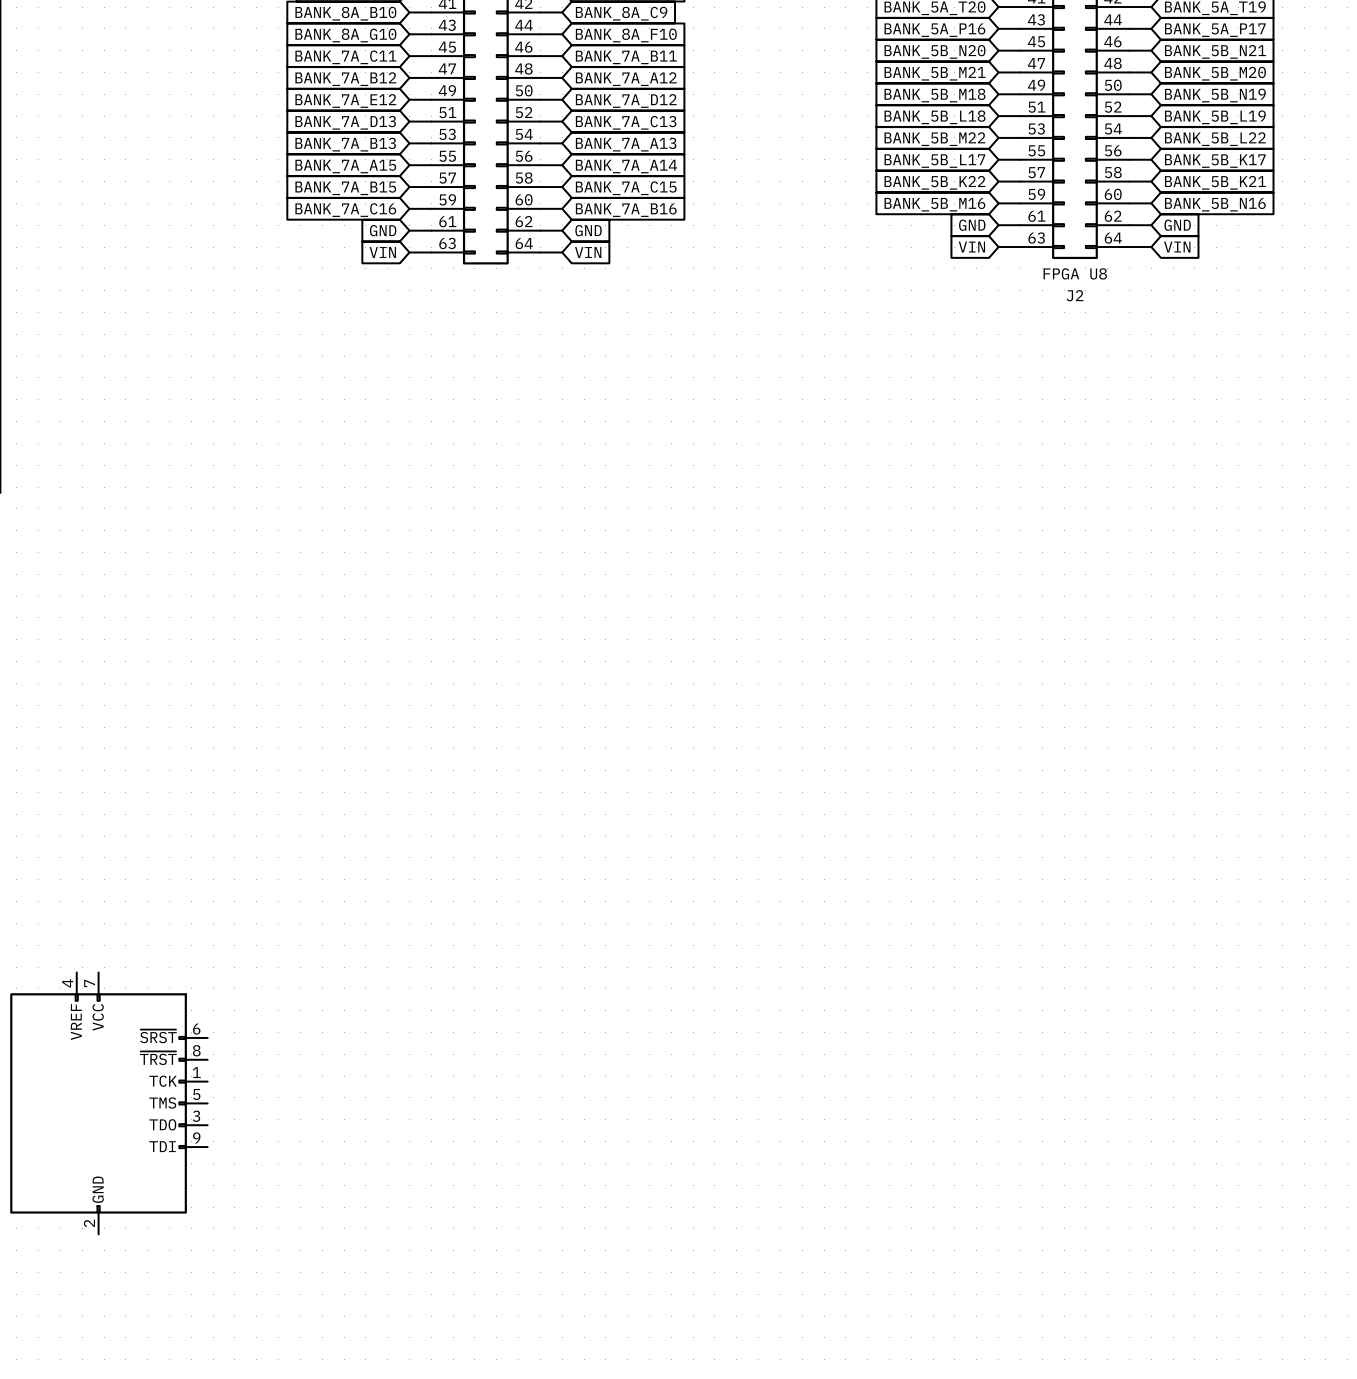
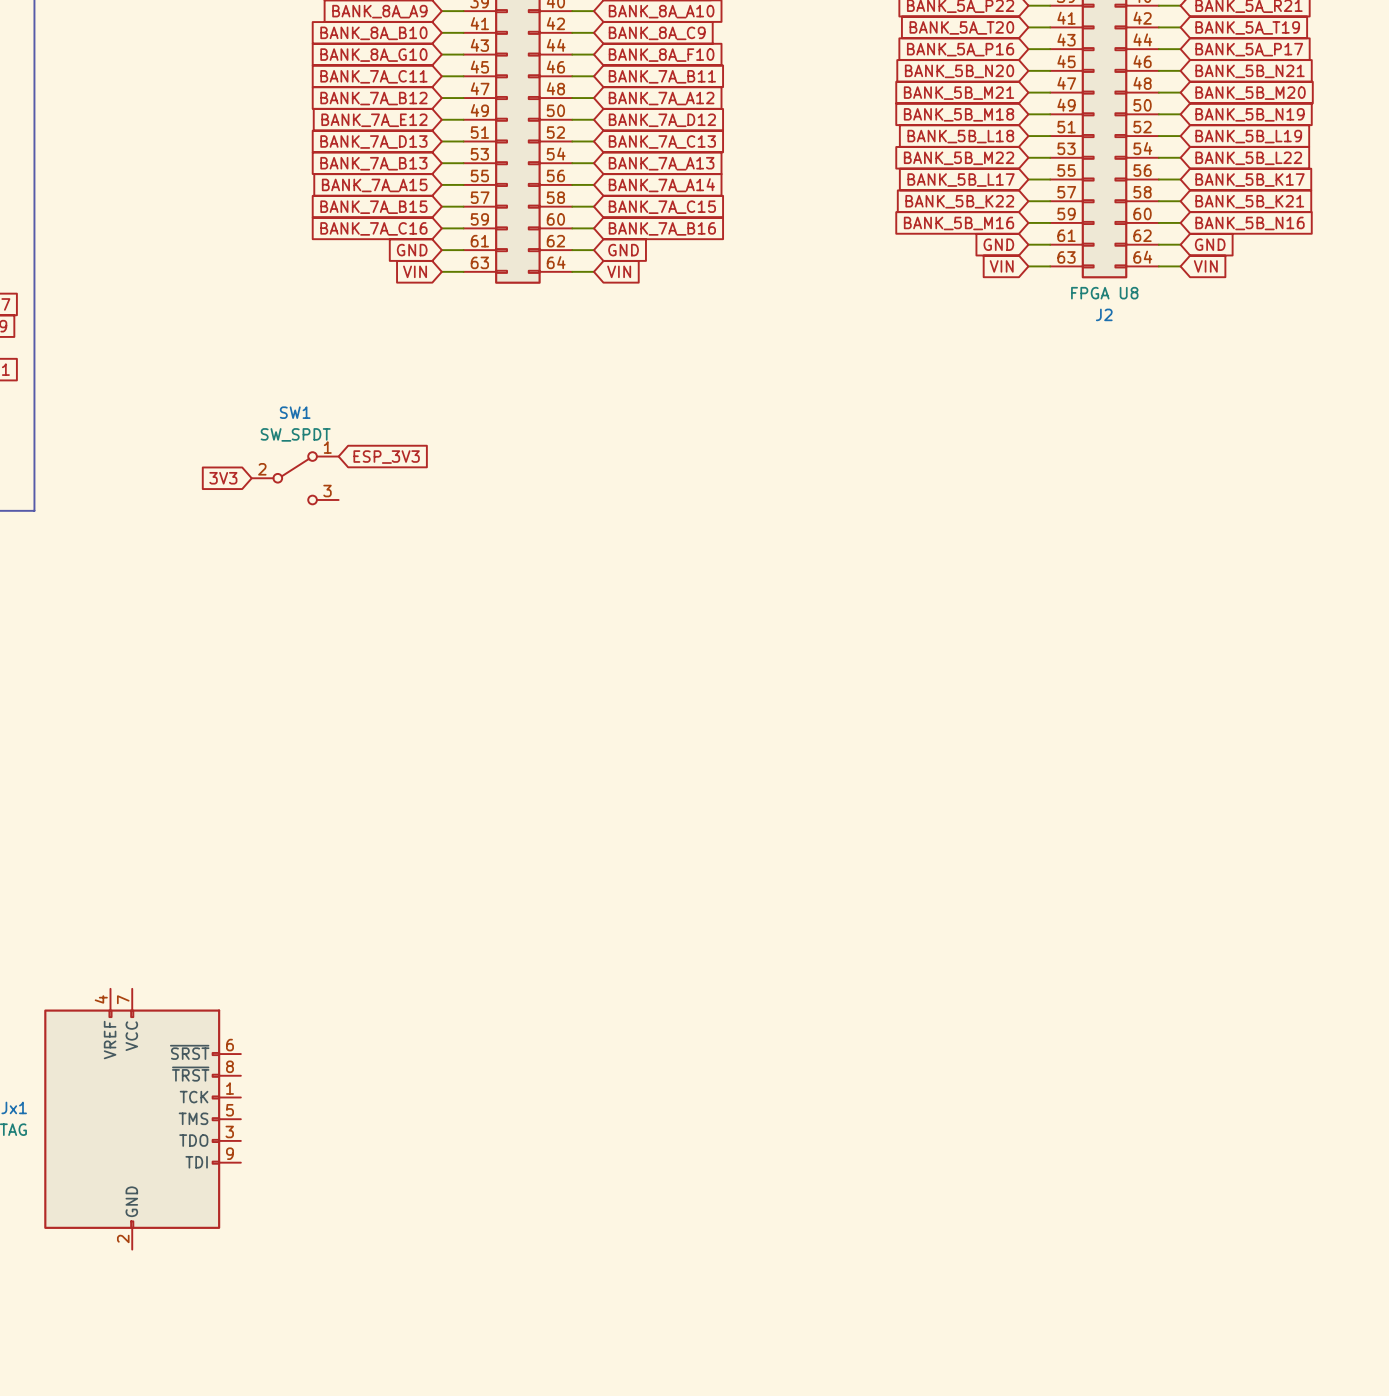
global label: none -> ESP_3V3 (386, 457)
global label: none -> 3V3 (223, 478)
SW1: none -> SW_SPDT (295, 478)

